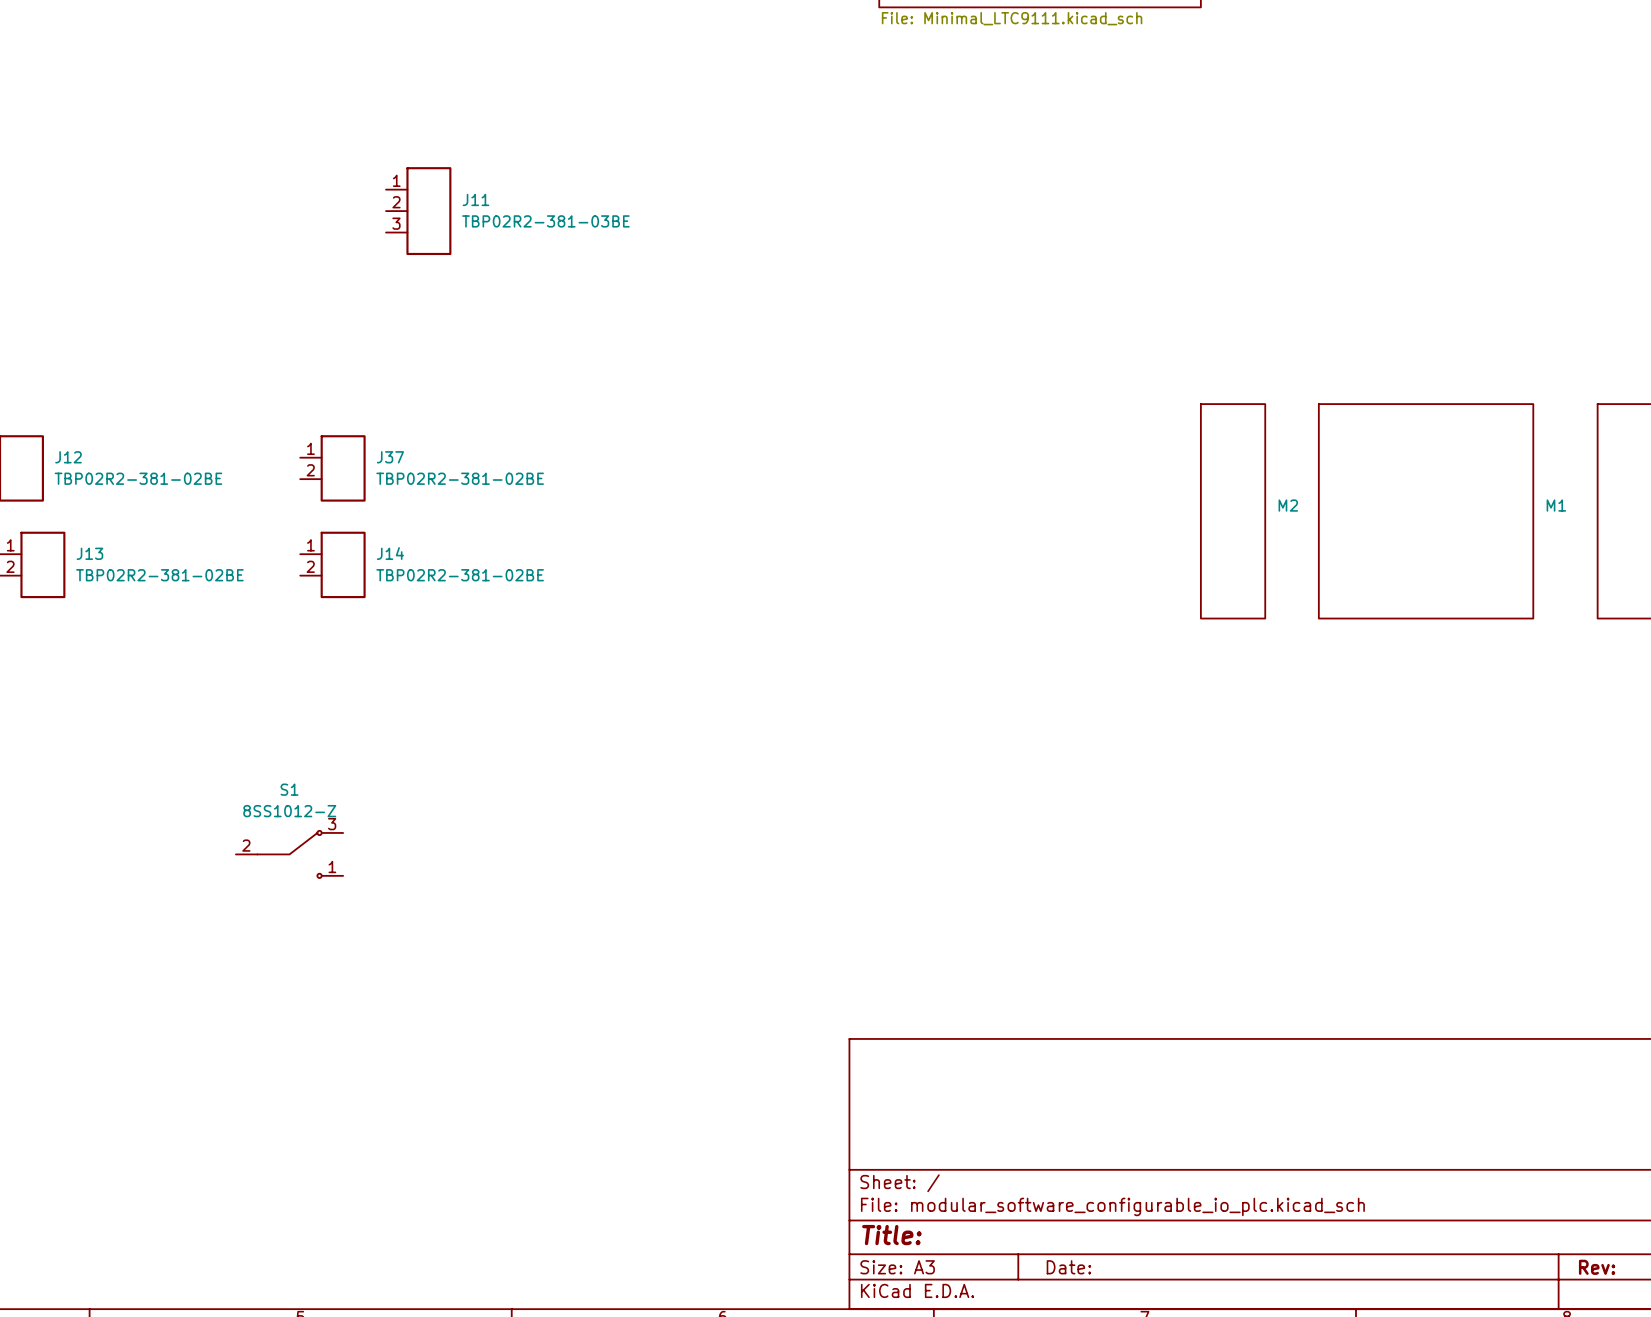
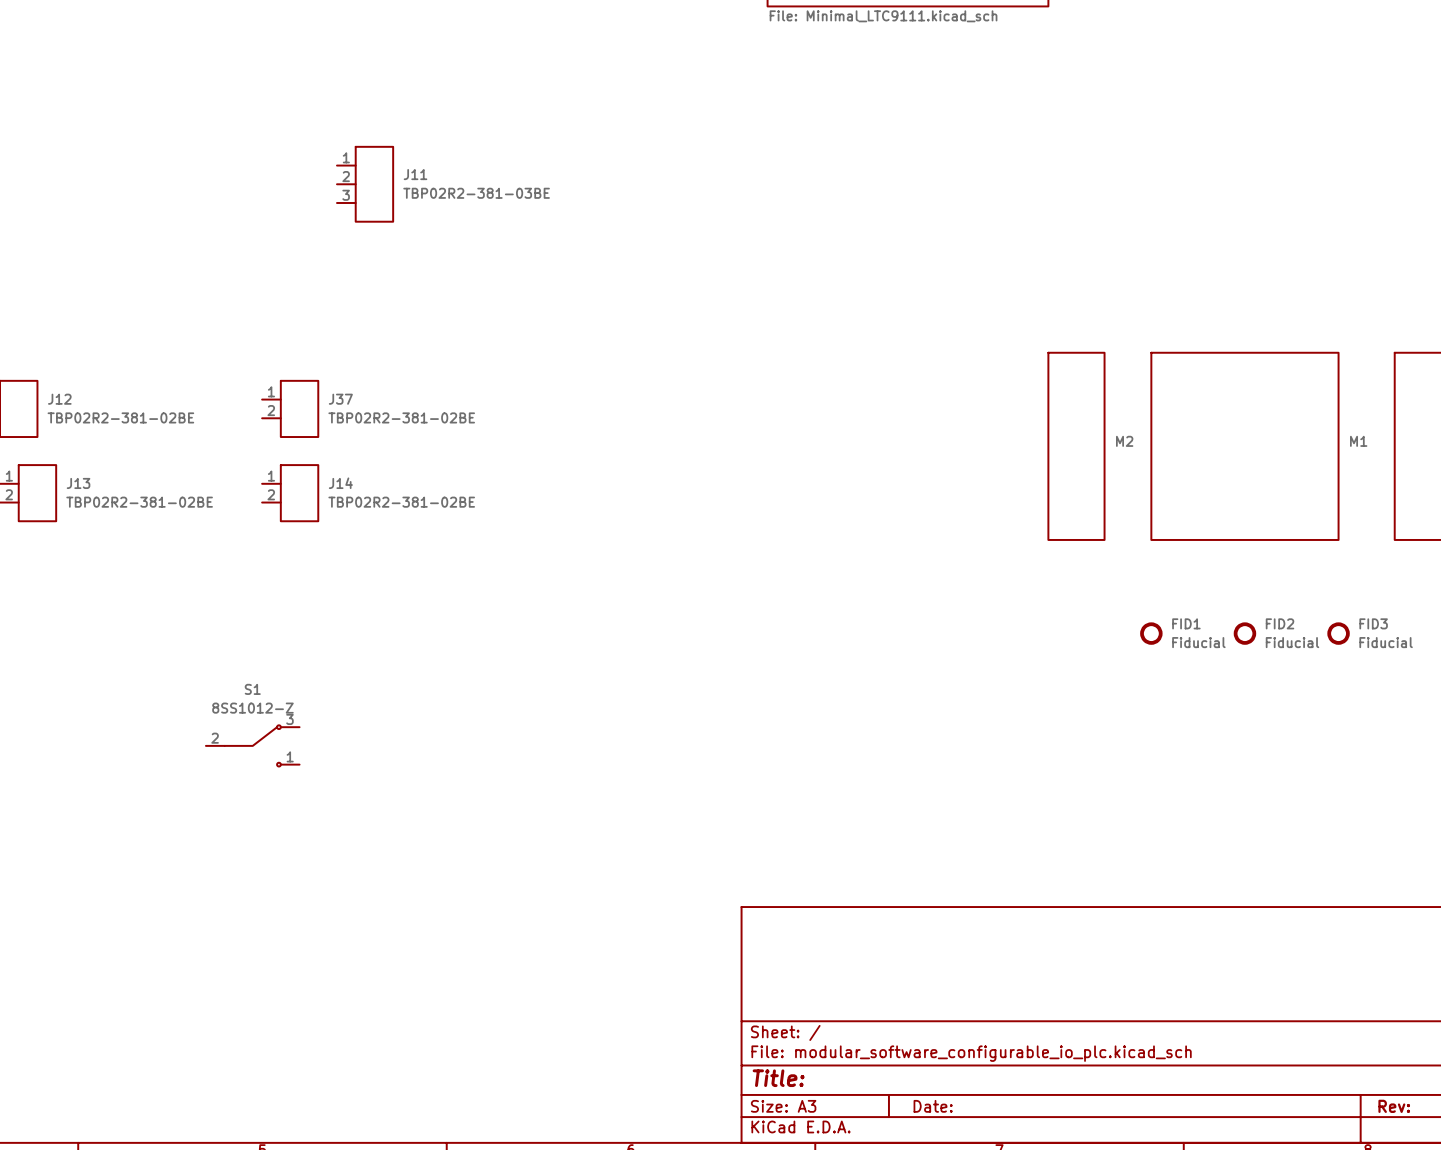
FID1: none -> Fiducial (1151, 633)
FID2: none -> Fiducial (1244, 633)
FID3: none -> Fiducial (1338, 633)

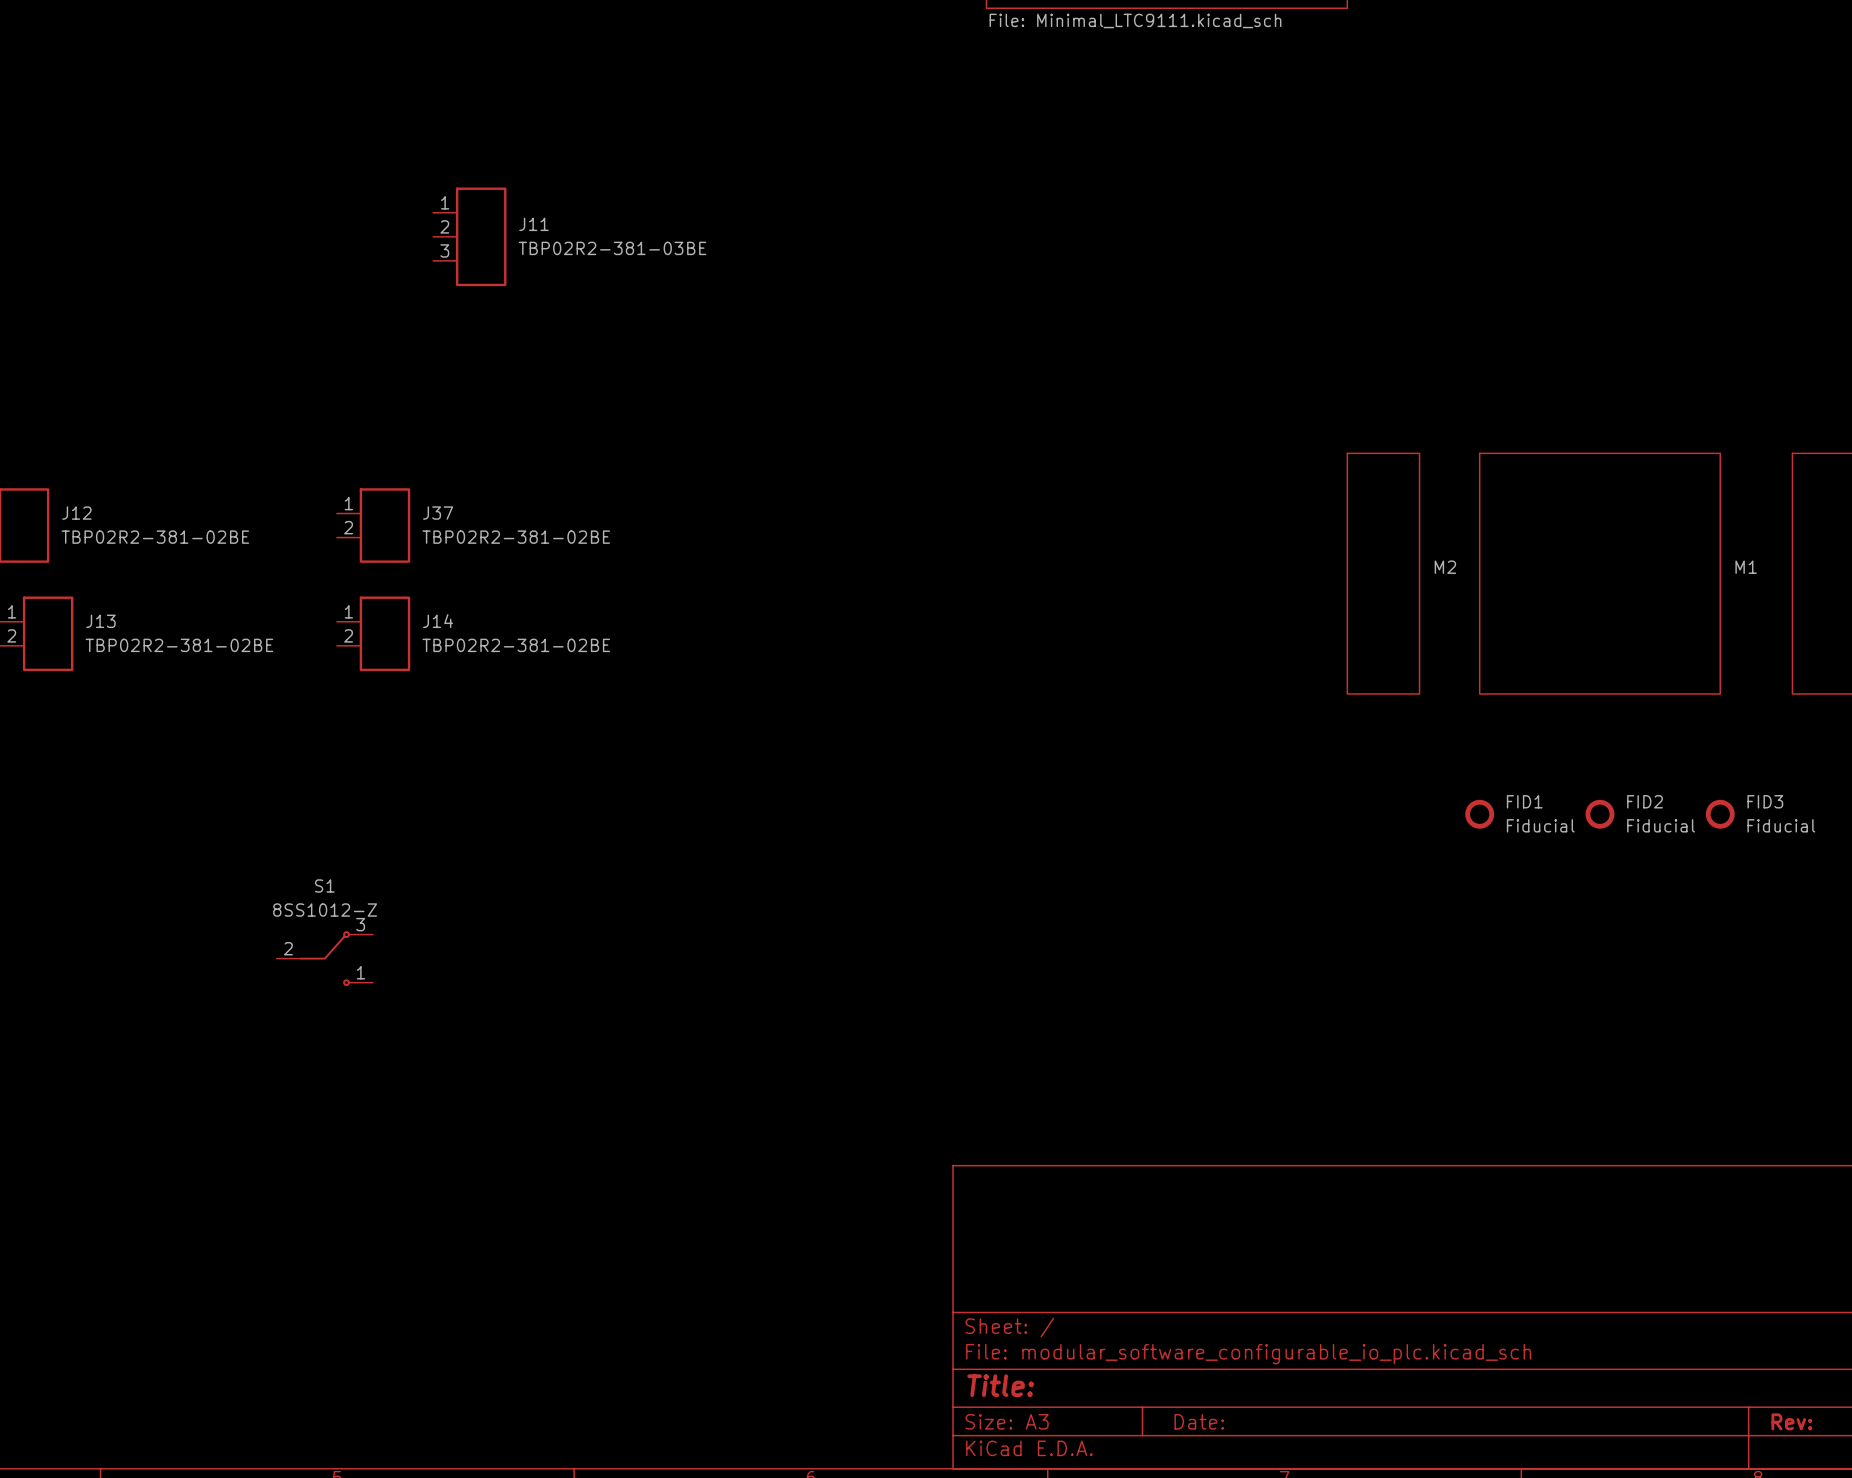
S1 symbol: [205, 724, 300, 768] -> [276, 931, 373, 987]

